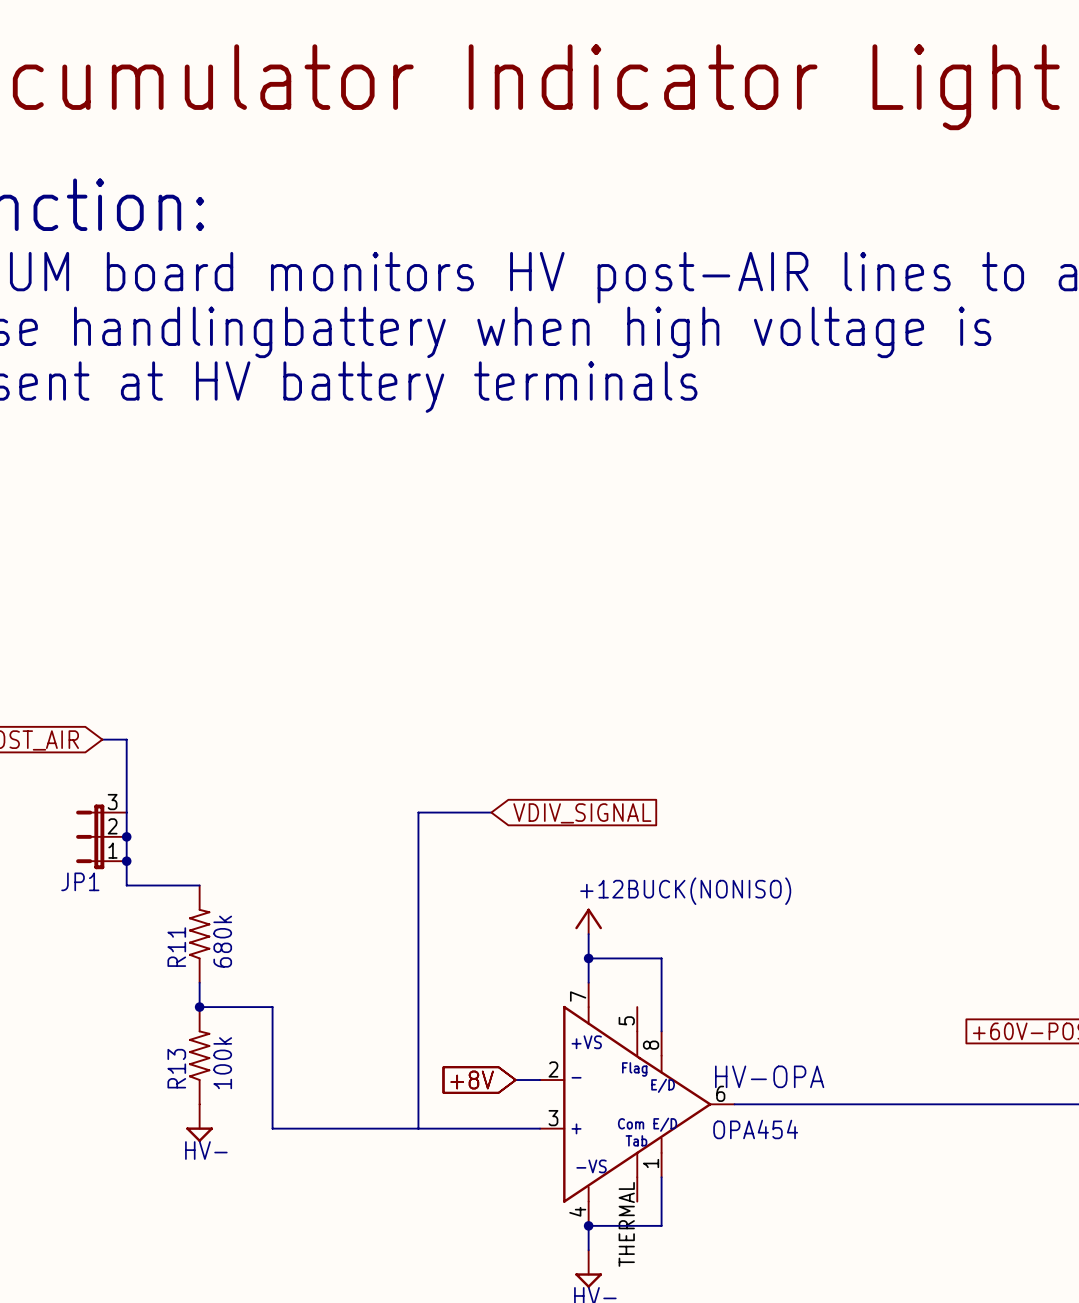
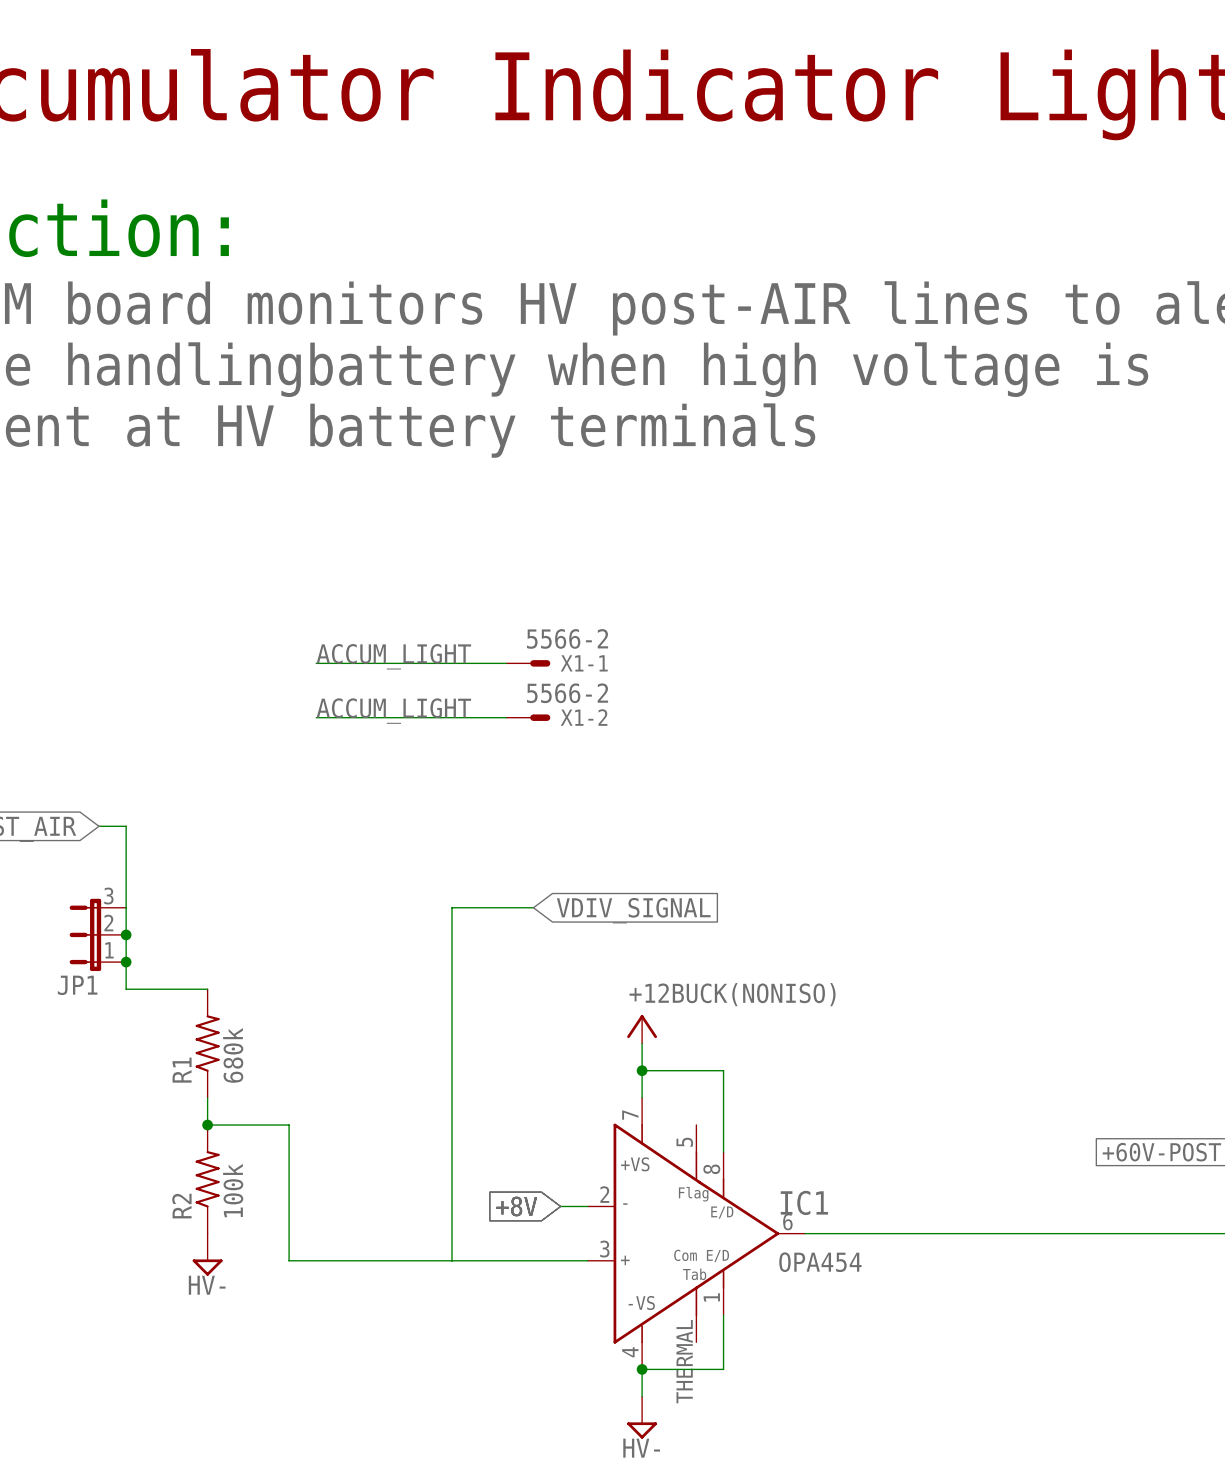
label: none -> ACCUM_LIGHT (393, 656)
wire: none -> (316, 663) (506, 663)
X1-1: none -> 5566-2 (528, 663)
label: none -> ACCUM_LIGHT (393, 711)
wire: none -> (316, 717) (506, 717)
X1-2: none -> 5566-2 (528, 717)
R11 name: R11 (176, 947) -> R1 (182, 1070)
R13 name: R13 (176, 1068) -> R2 (181, 1206)
HV-OPA name: HV-OPA (769, 1076) -> IC1 (804, 1202)

